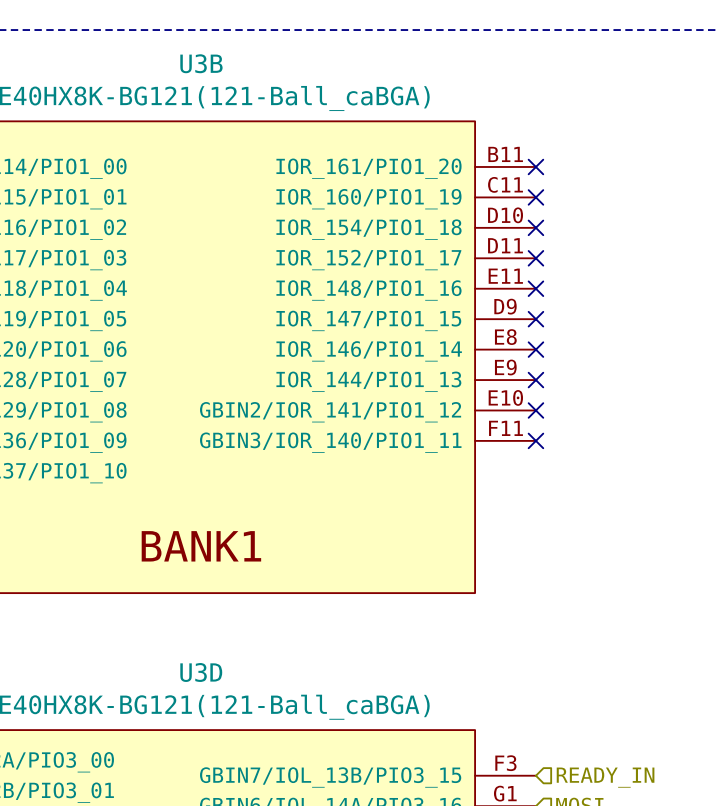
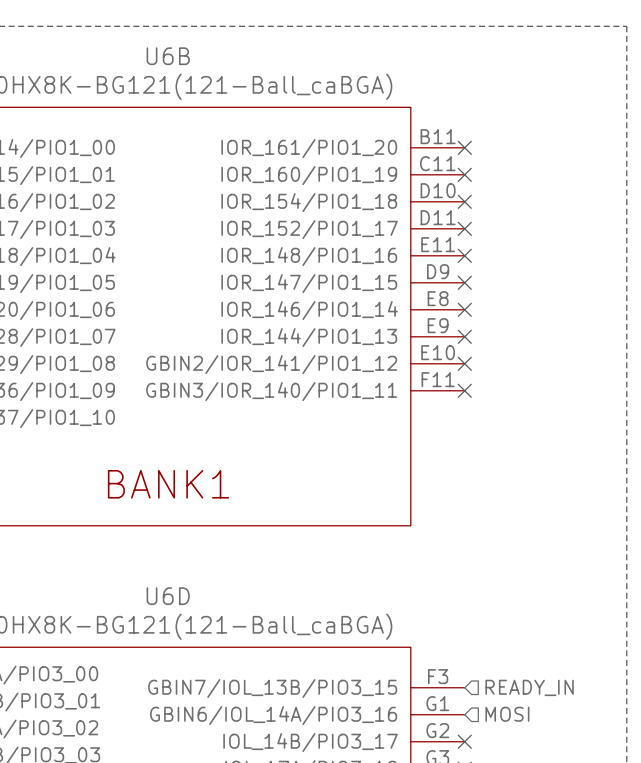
U3B name: U3B (201, 63) -> U6B (168, 56)
U3D name: U3D (201, 672) -> U6D (168, 596)

